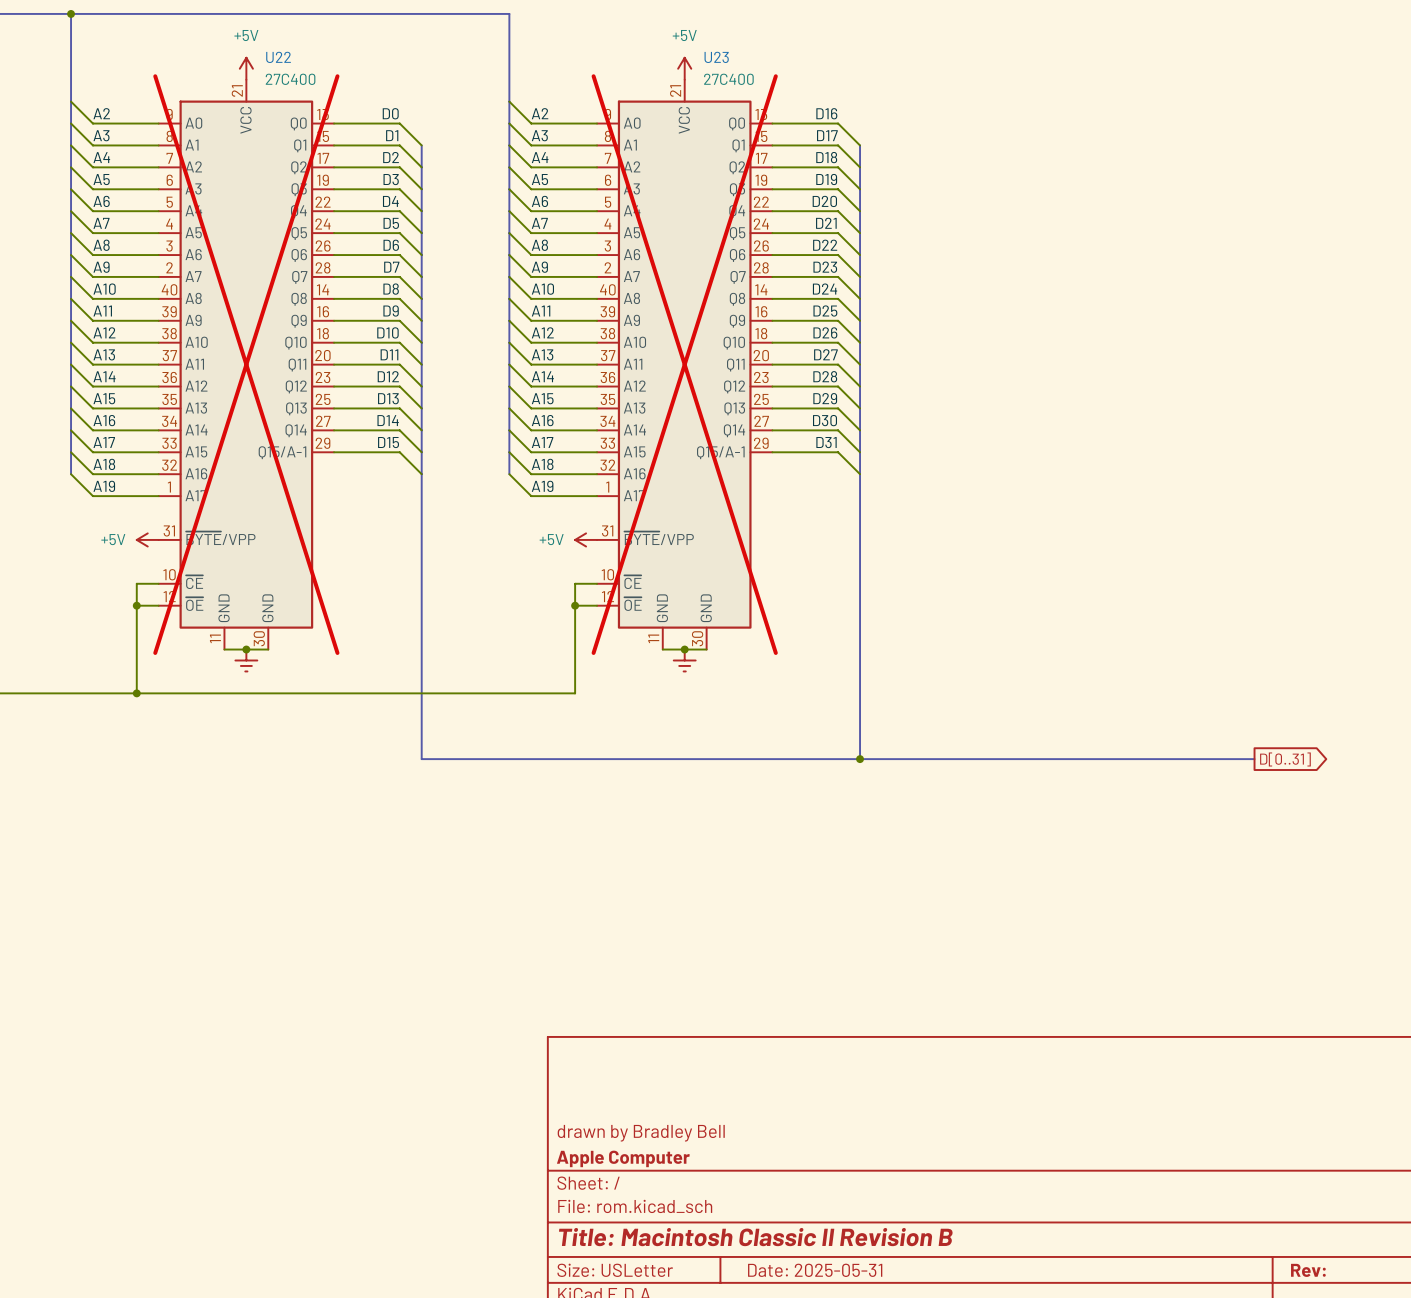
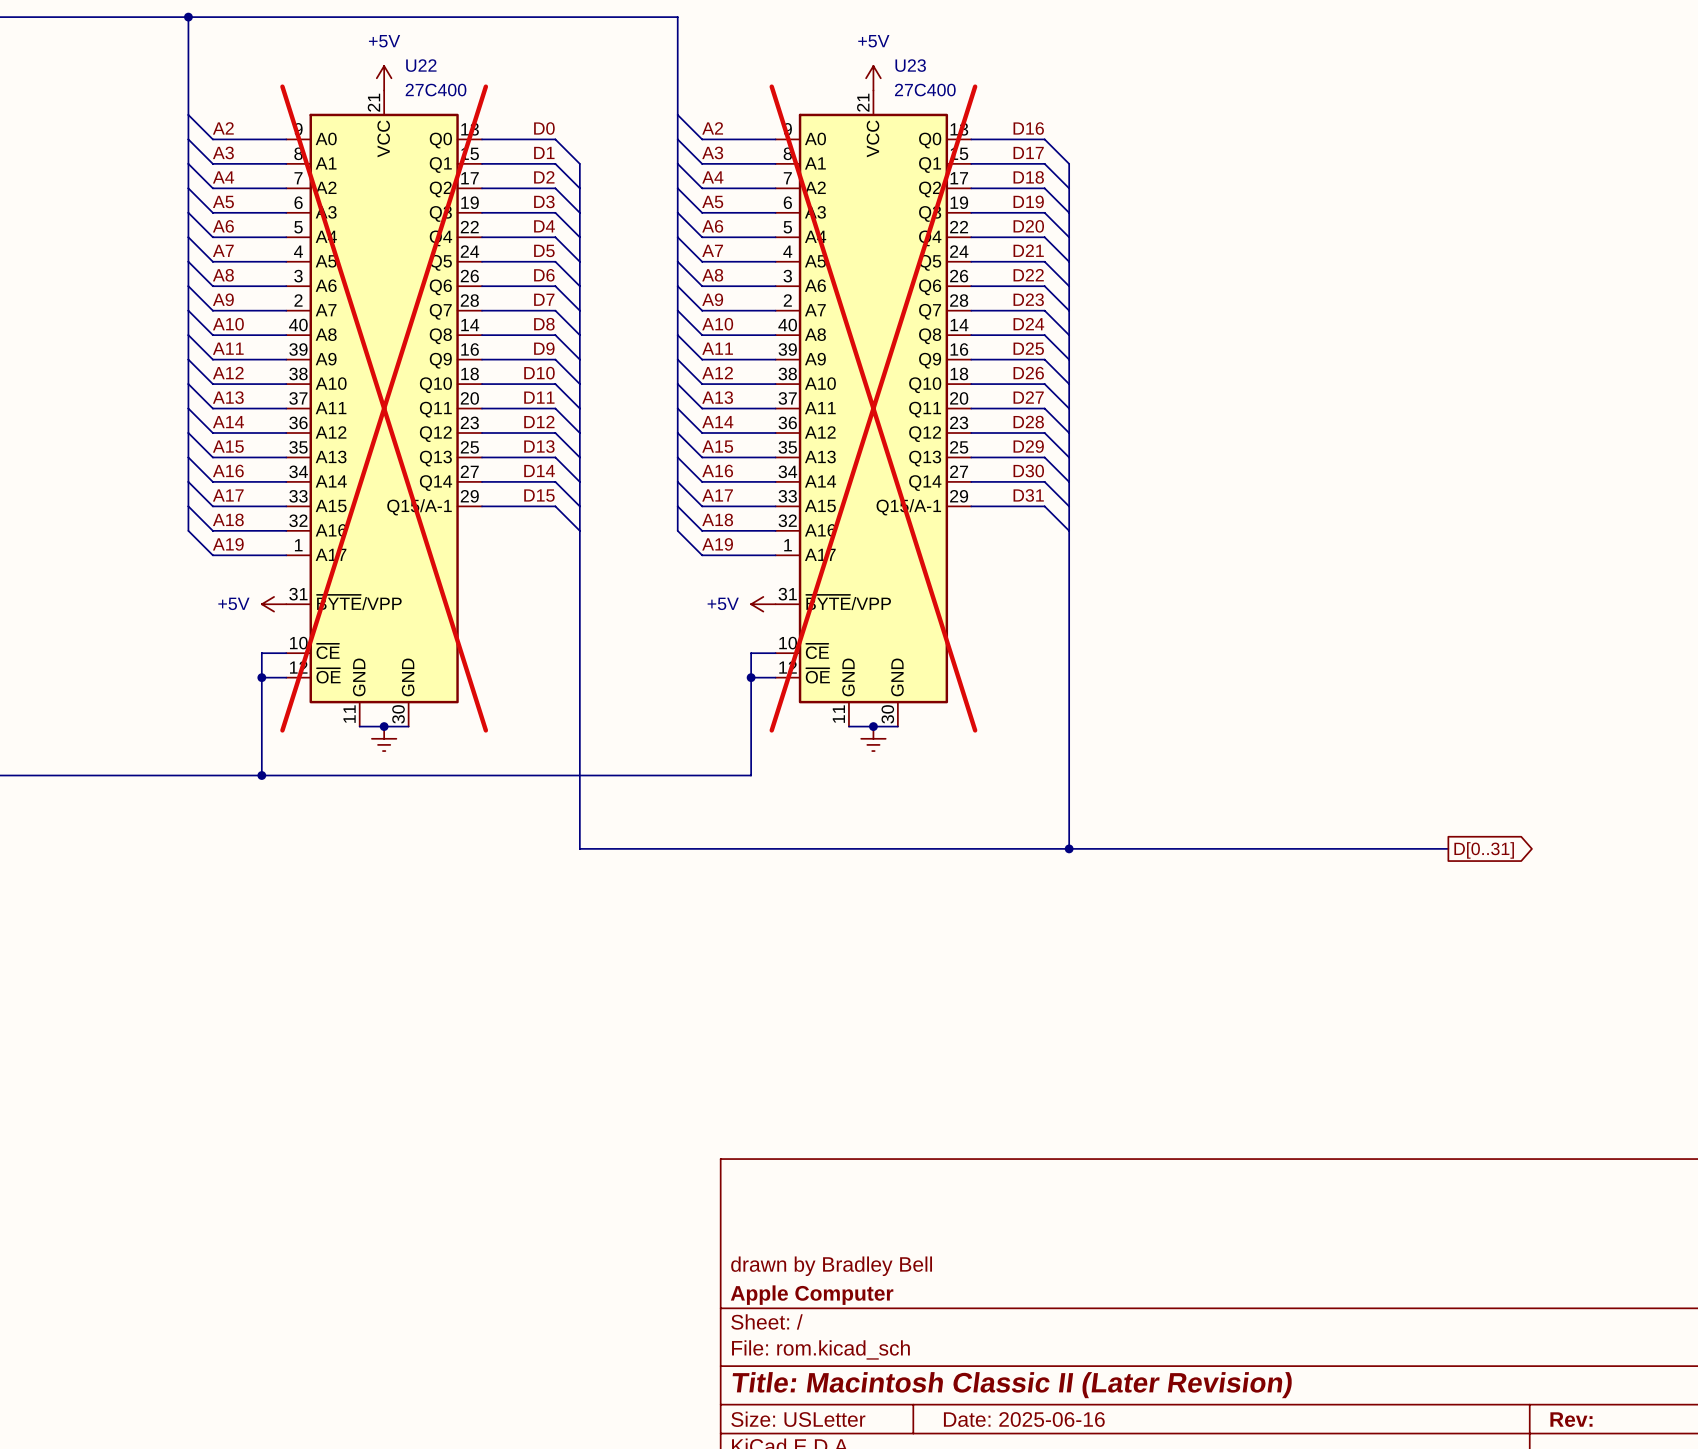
bus: (1199, 759) (1254, 759) -> none
global label position: D[0..31] (1285, 759) -> D[0..31] (1484, 850)
title block: Title: Macintosh Classic II Revision B (756, 1237) -> Title: Macintosh Classic II (Later Revision) (1012, 1385)
title block: Date: 2025-05-31 (815, 1270) -> Date: 2025-06-16 (1024, 1419)

